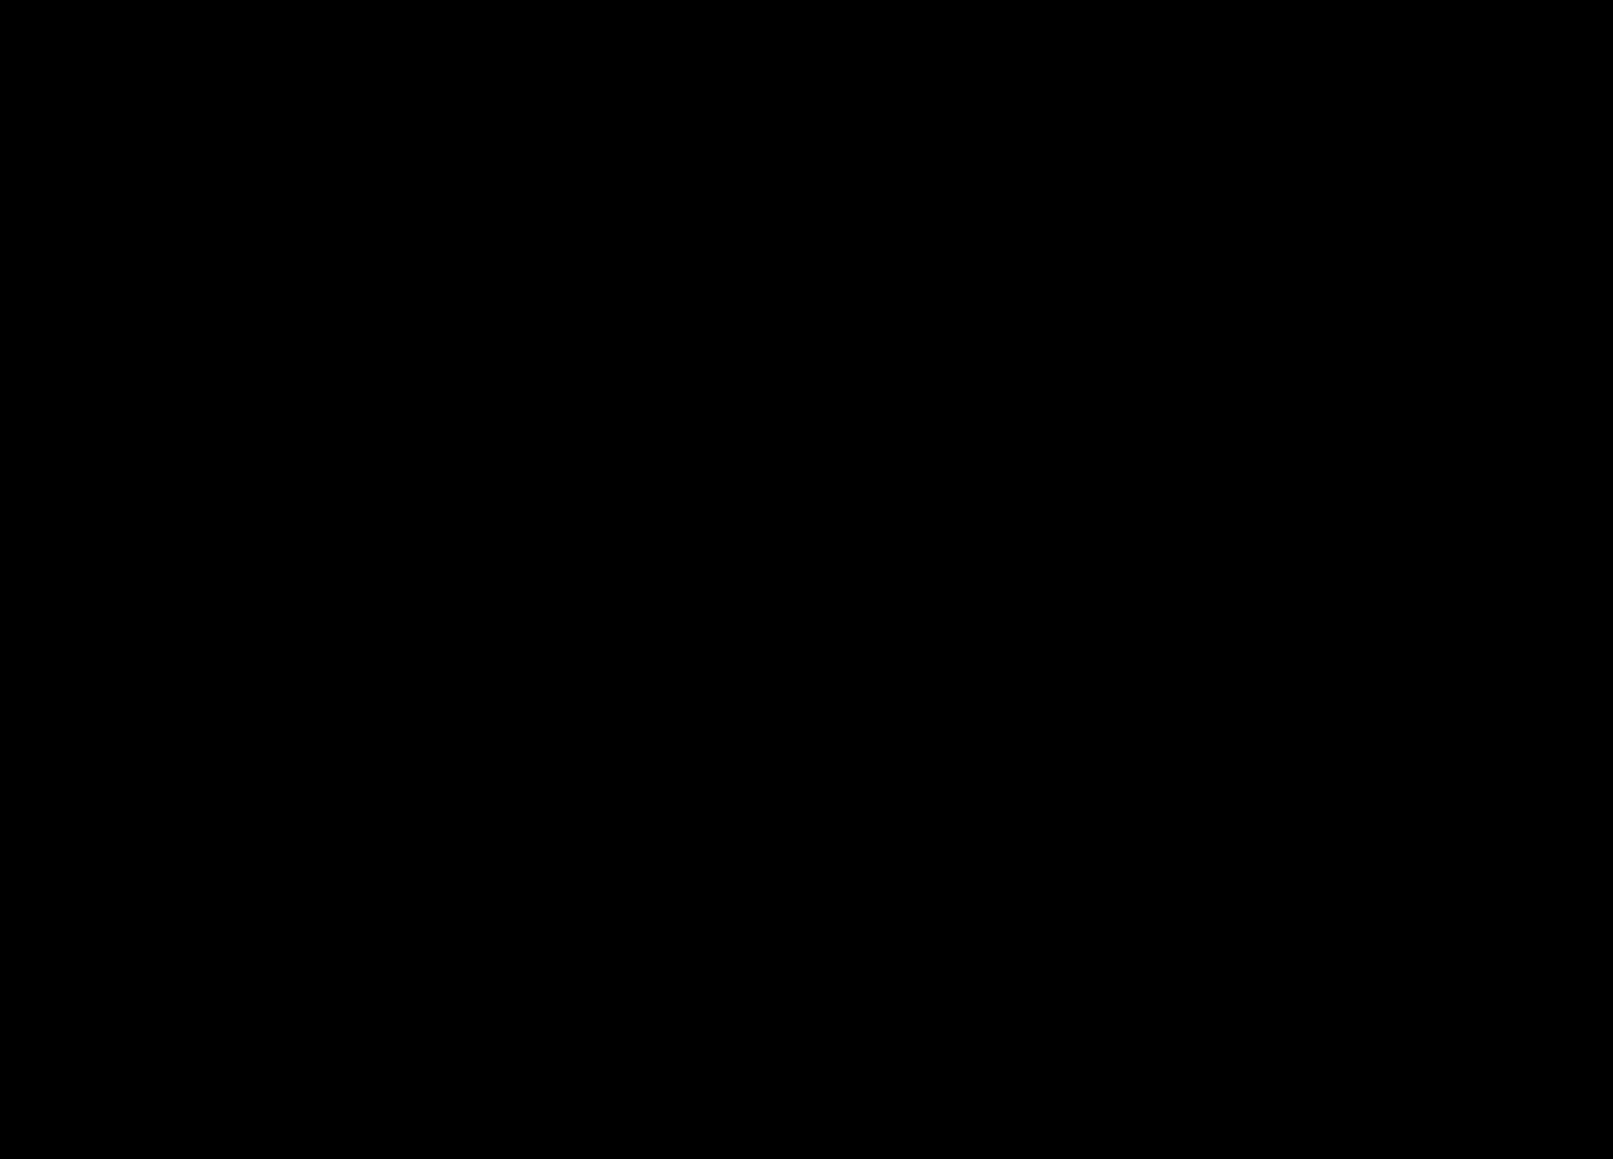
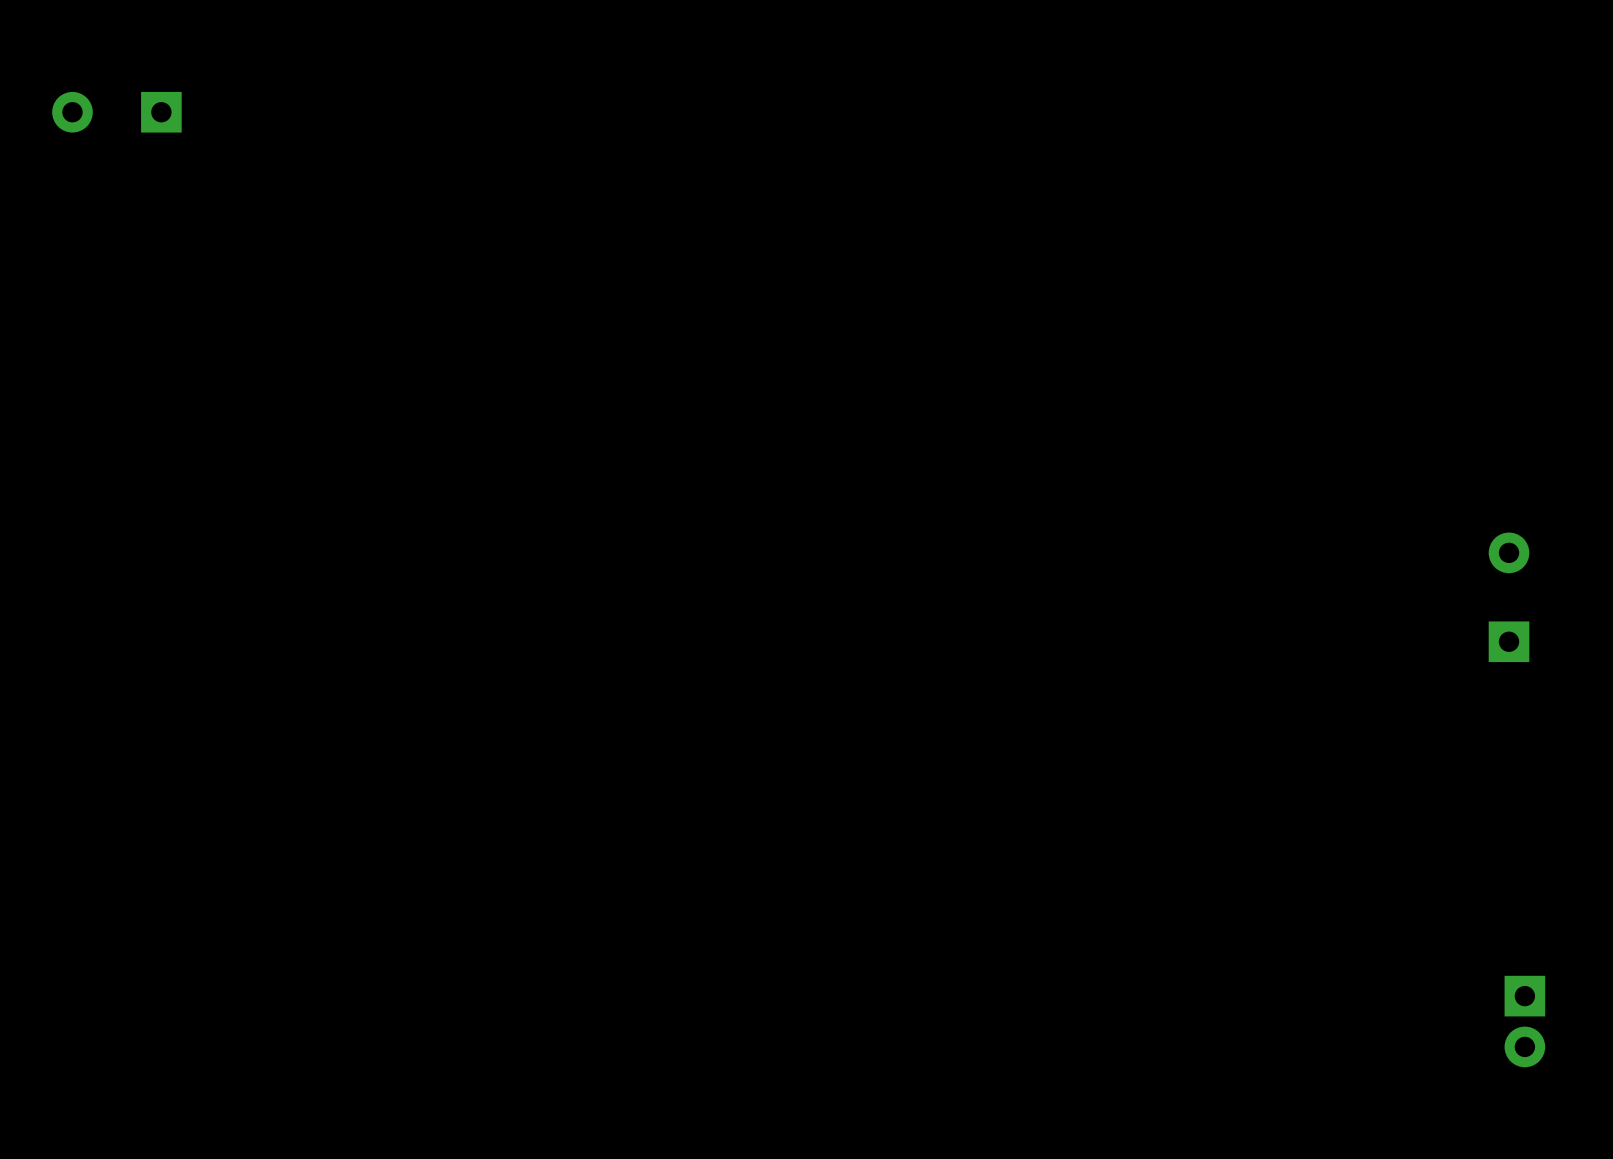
part: none -> (116, 112)
part: none -> (1509, 597)
part: none -> (1524, 1021)

